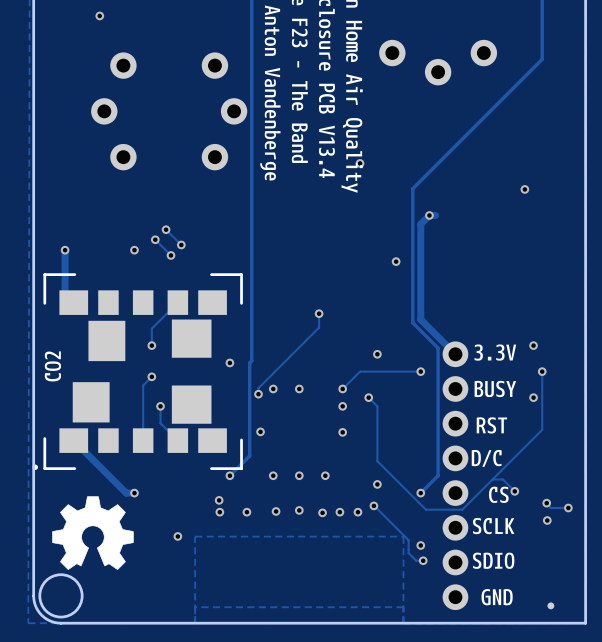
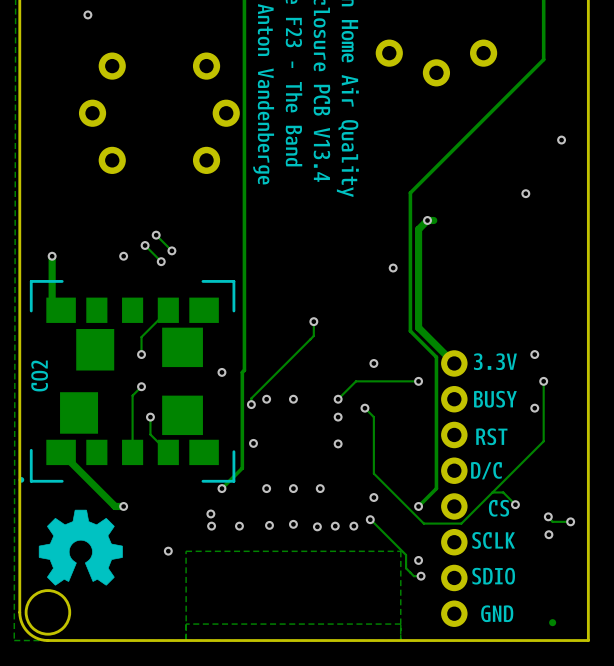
via: none -> (561, 140)
via: (360, 163) -> none

